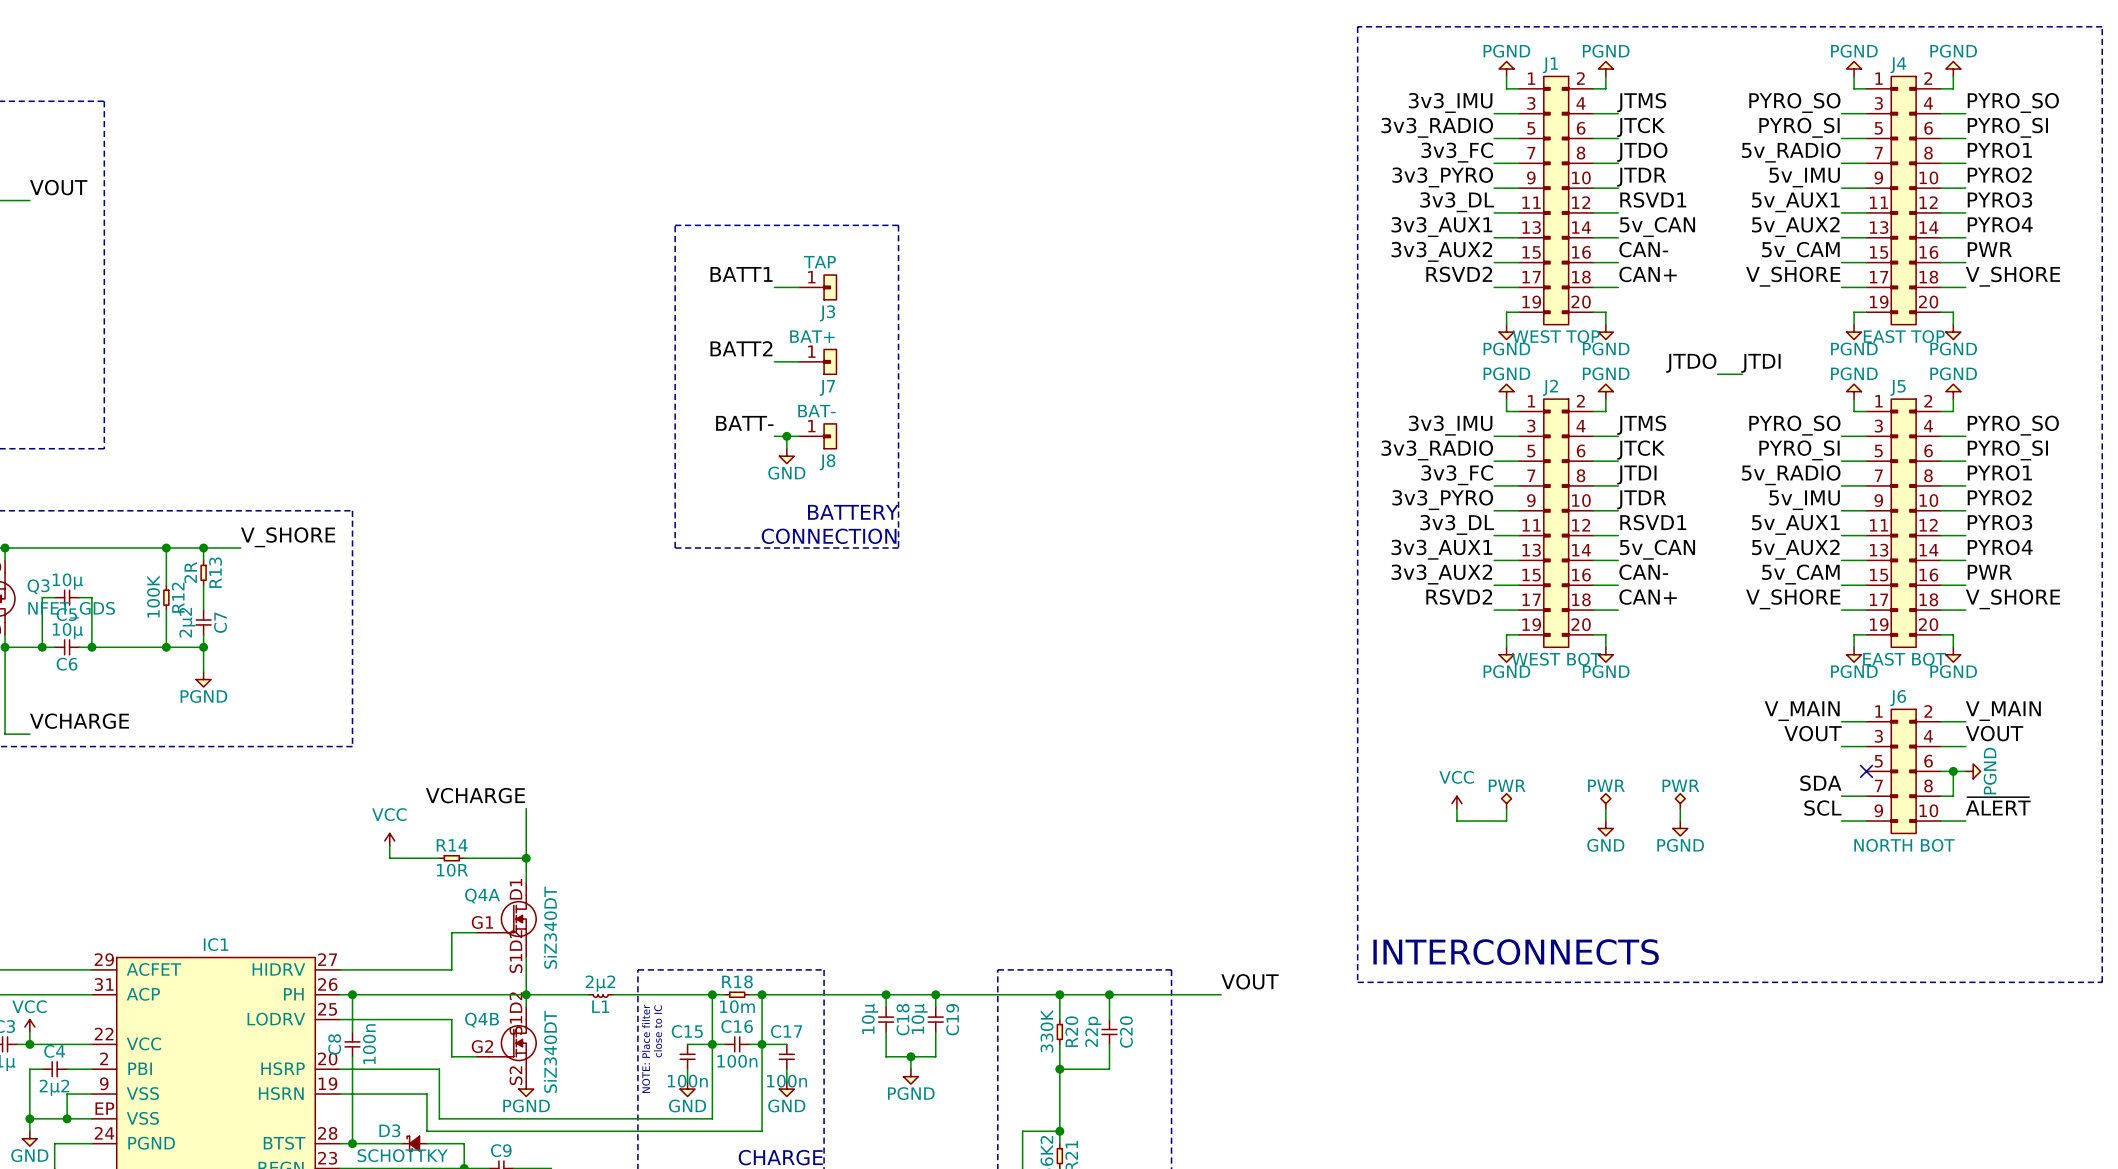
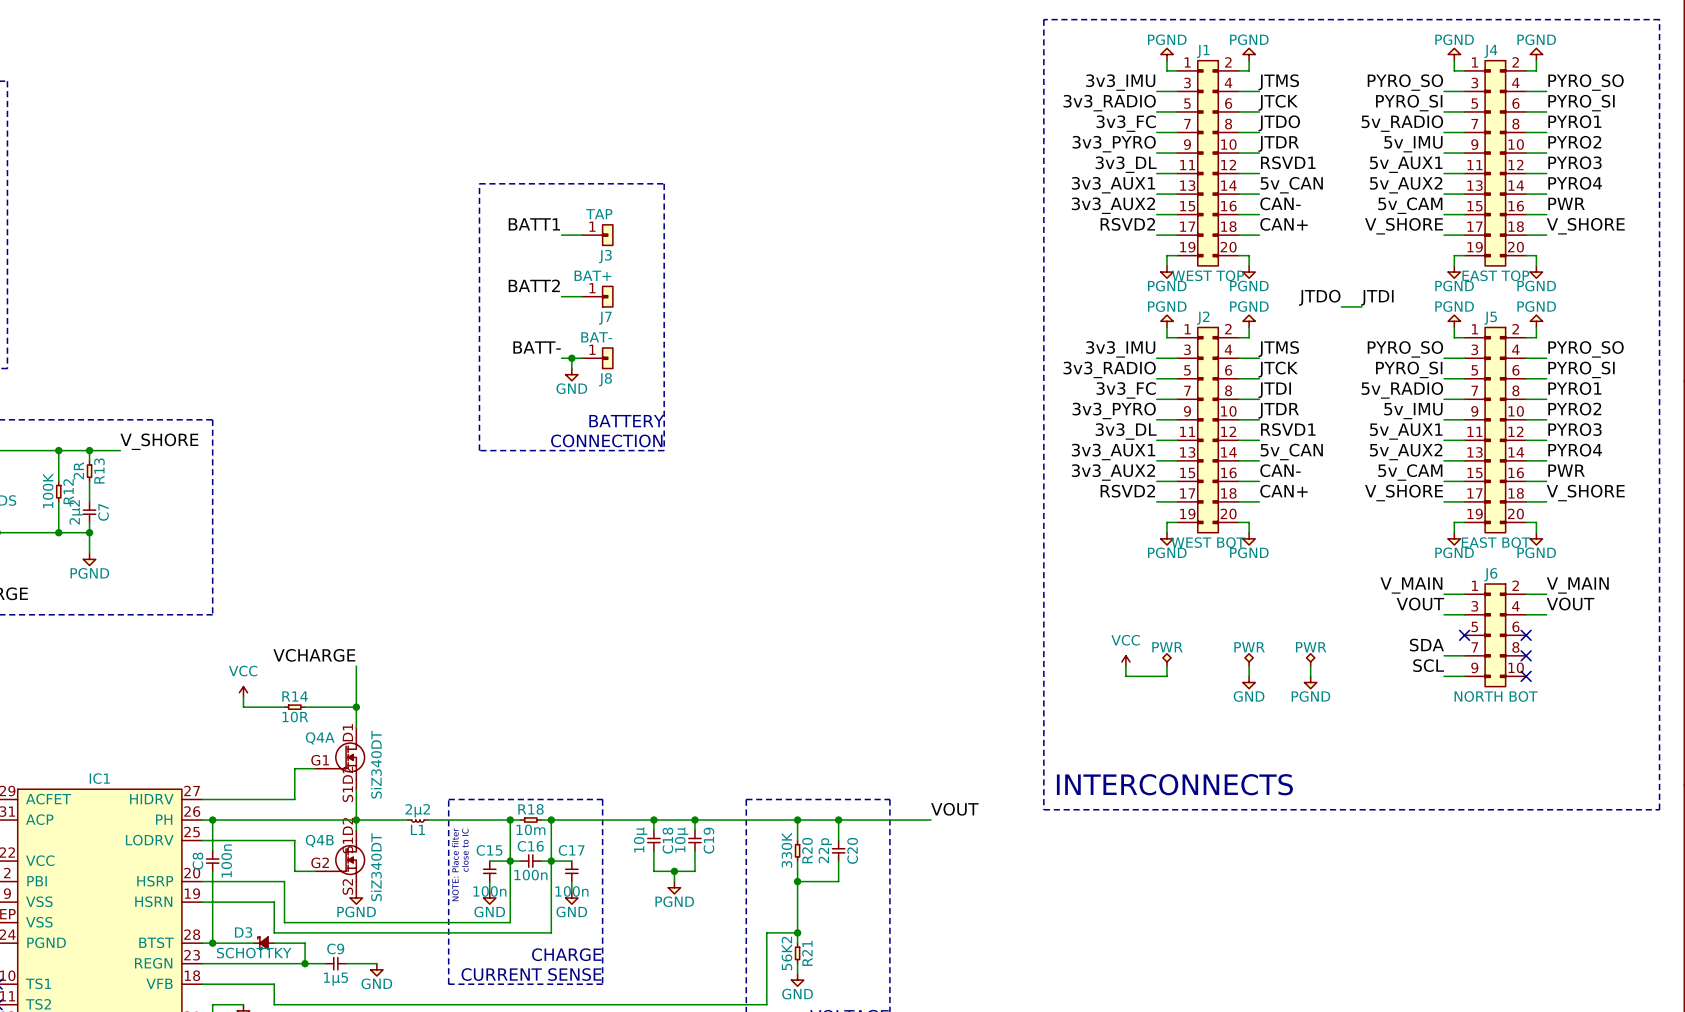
wire: (1940, 771) (1965, 771) -> none
no-connect mark: none -> (1526, 635)
wire: (1953, 771) (1953, 796) (1940, 796) -> none
junction: (1953, 771) -> none
power symbol: PGND (1973, 771) -> none
no-connect mark: none -> (1526, 655)
label: ~{ALERT} (1998, 806) -> none
wire: (1940, 821) (1965, 821) -> none
no-connect mark: none -> (1526, 676)

